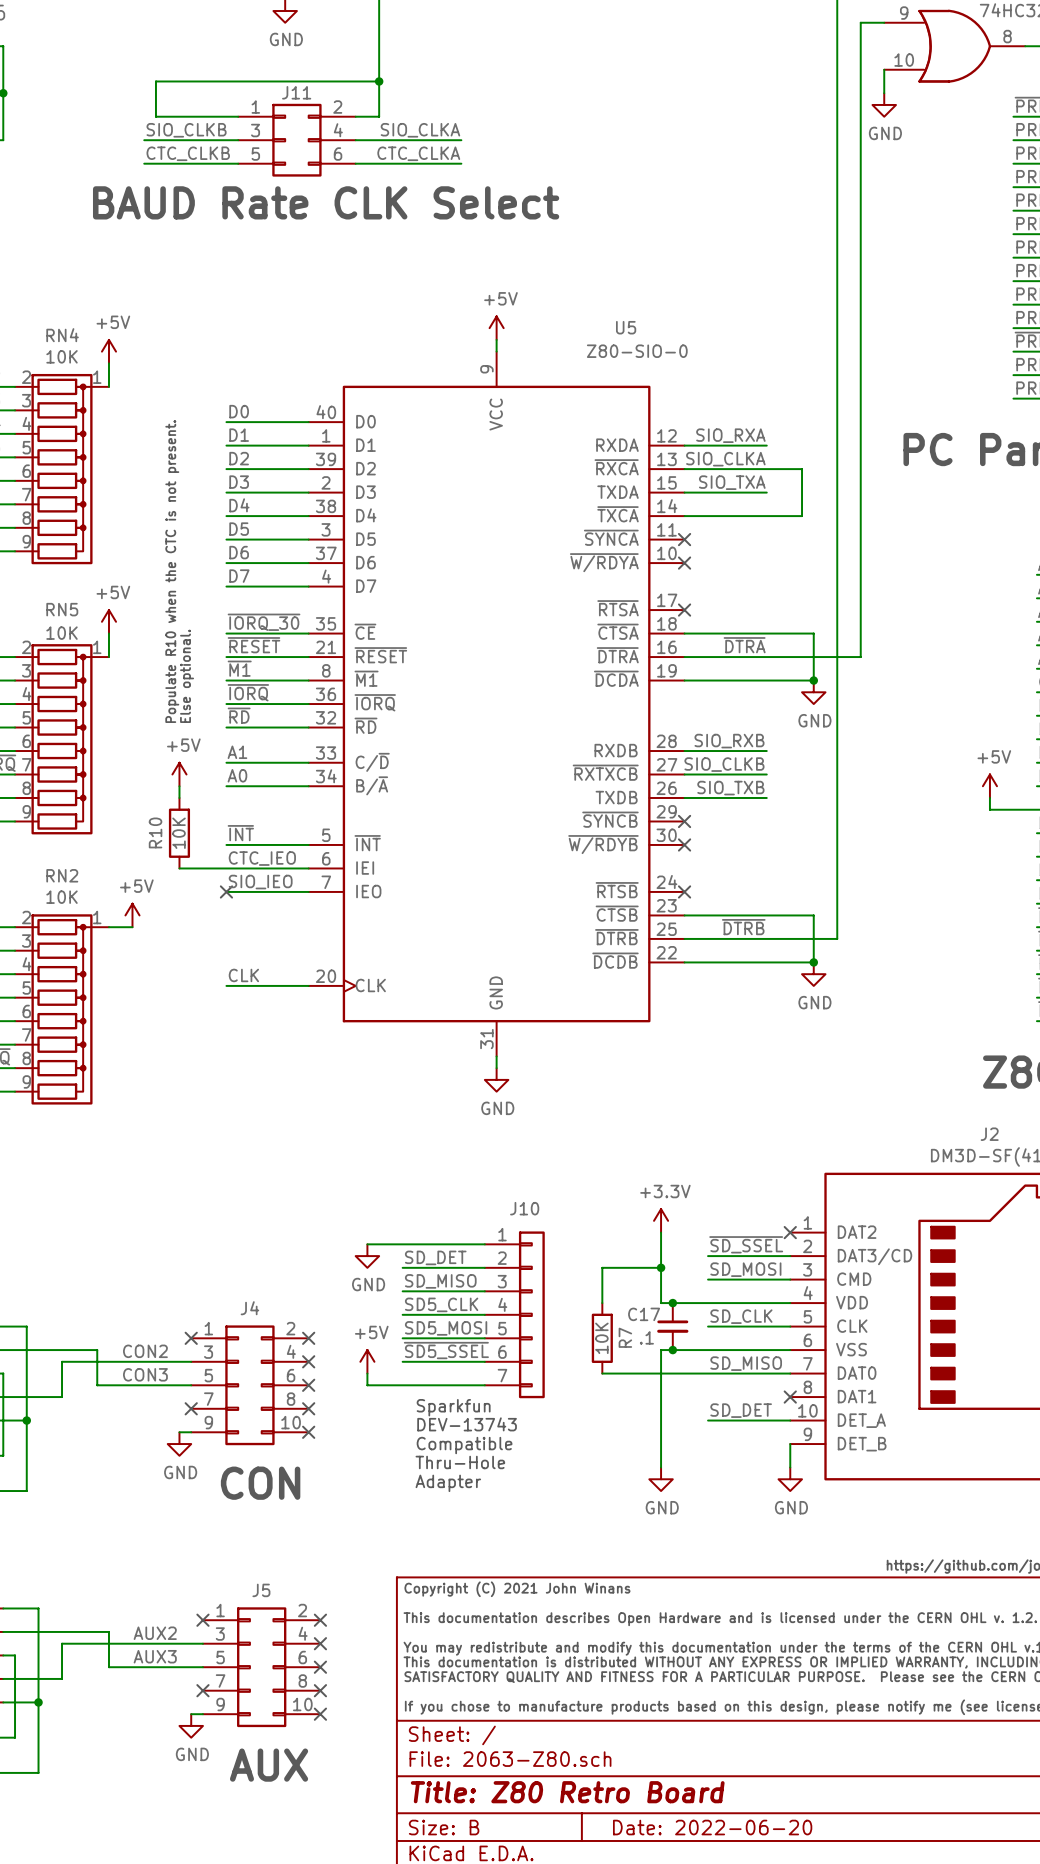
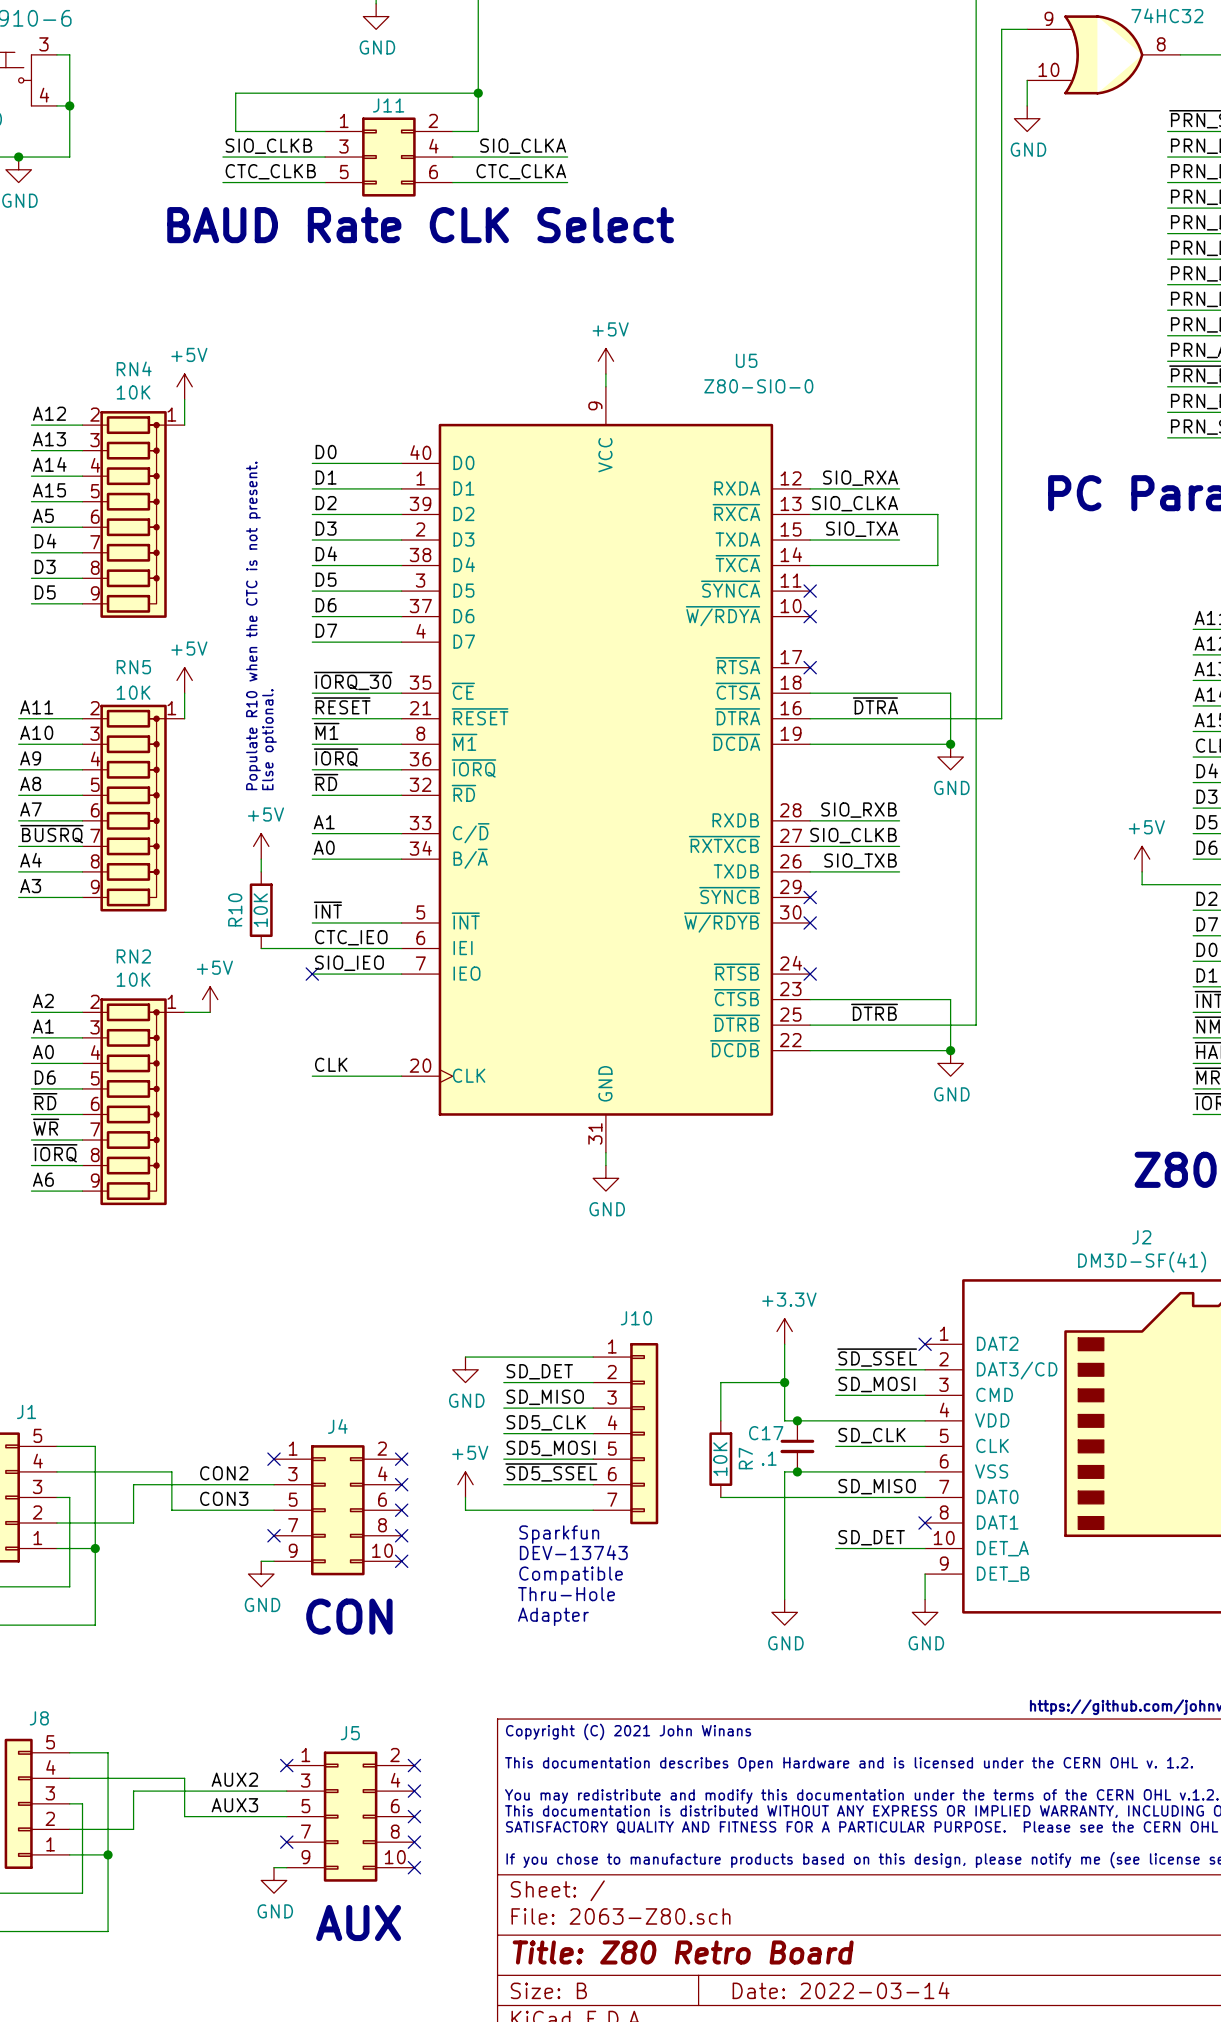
title block: Date: 2022-06-20 (712, 1827) -> Date: 2022-03-14 (841, 1990)

